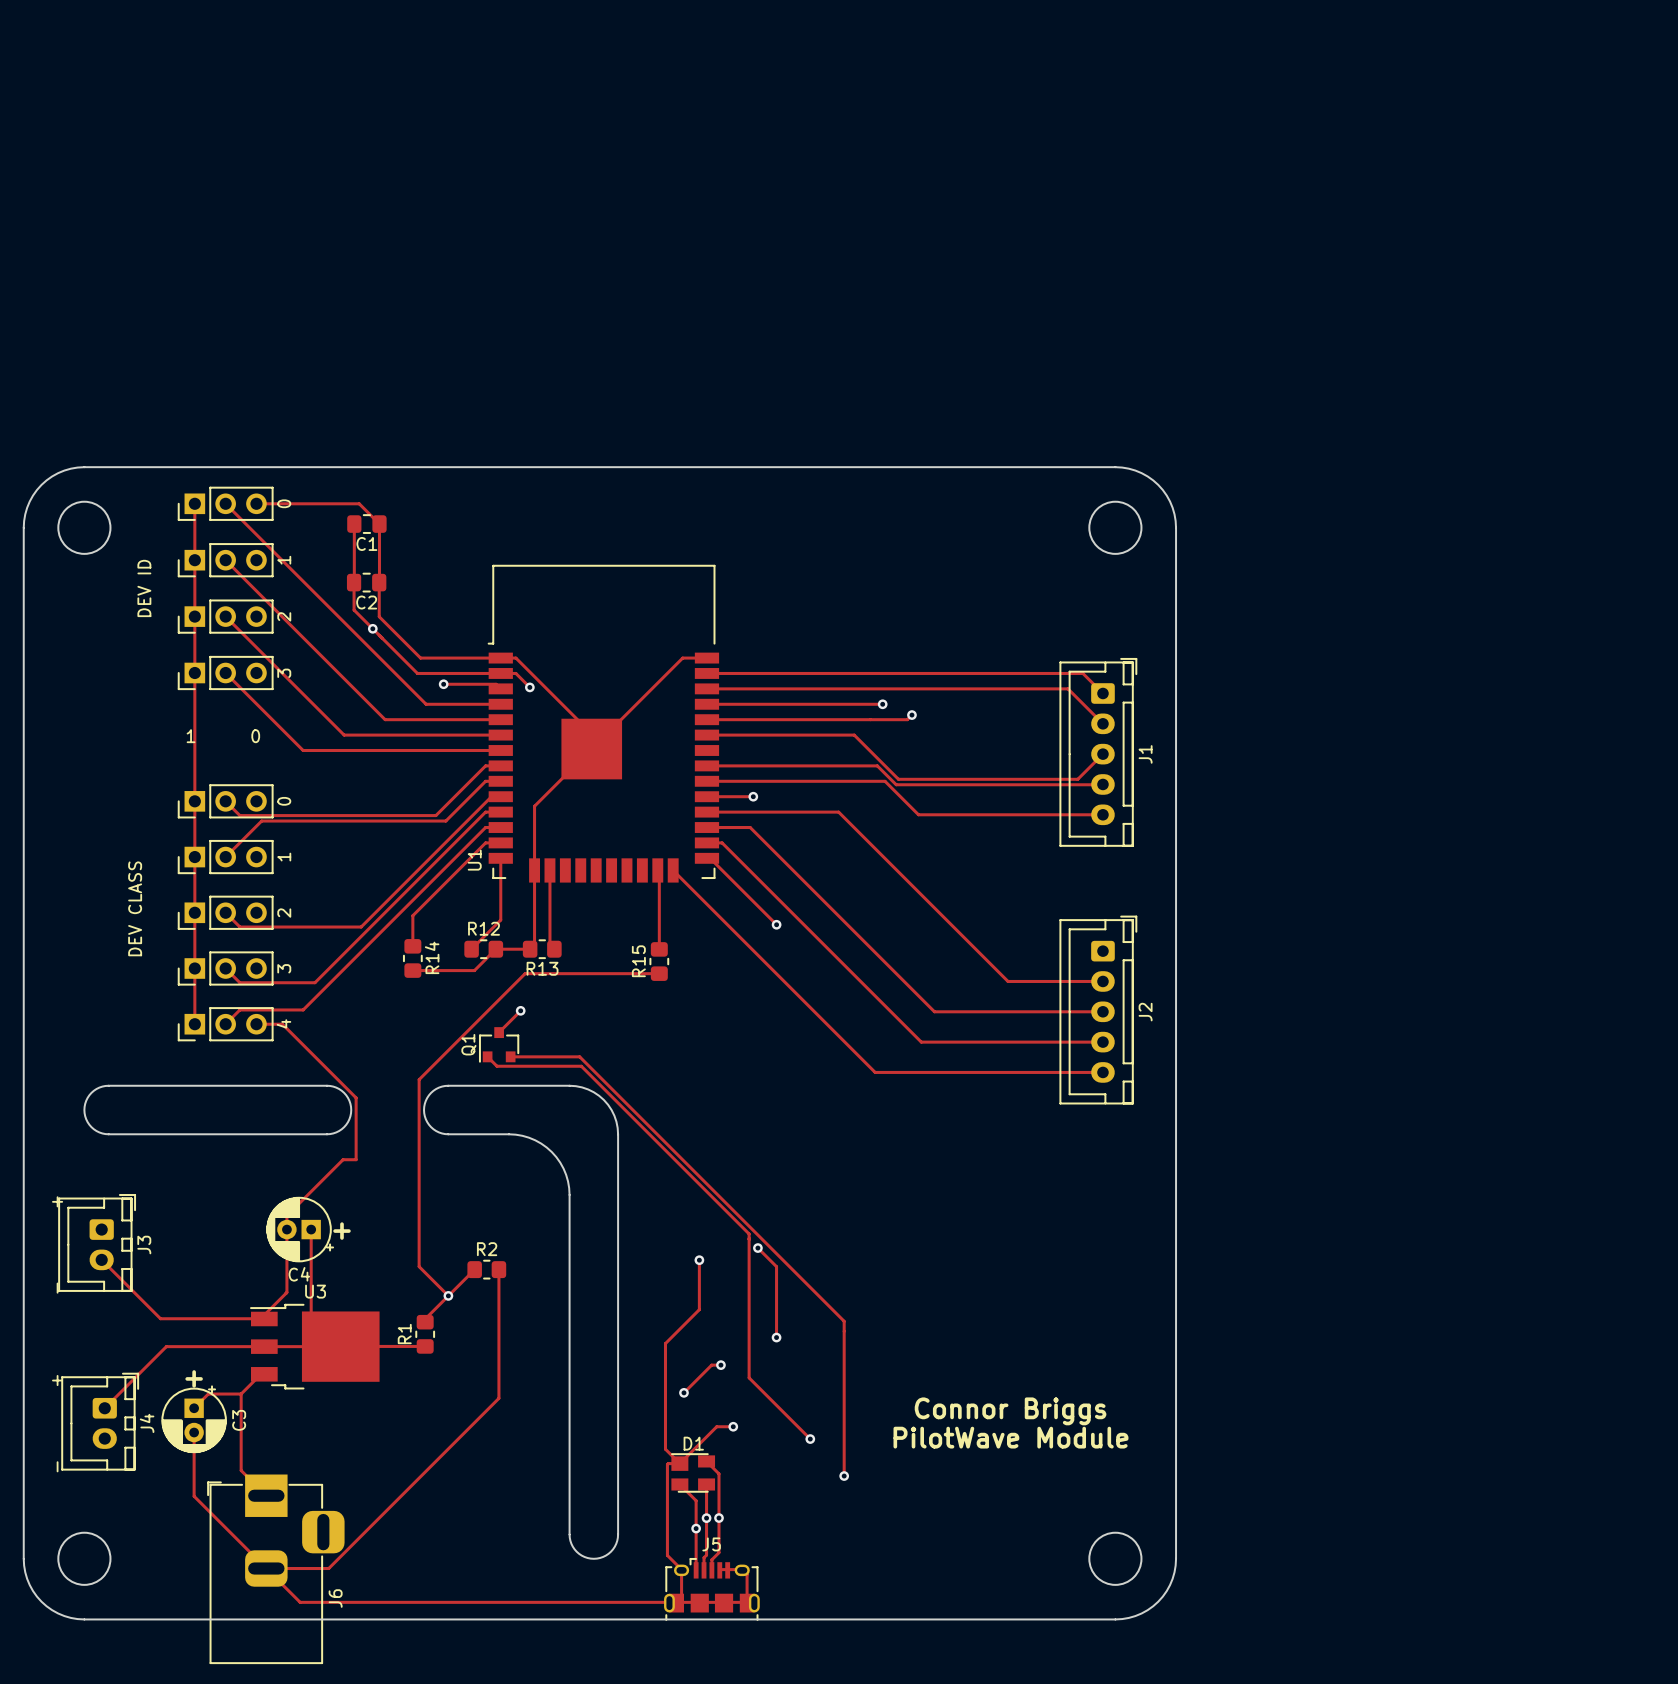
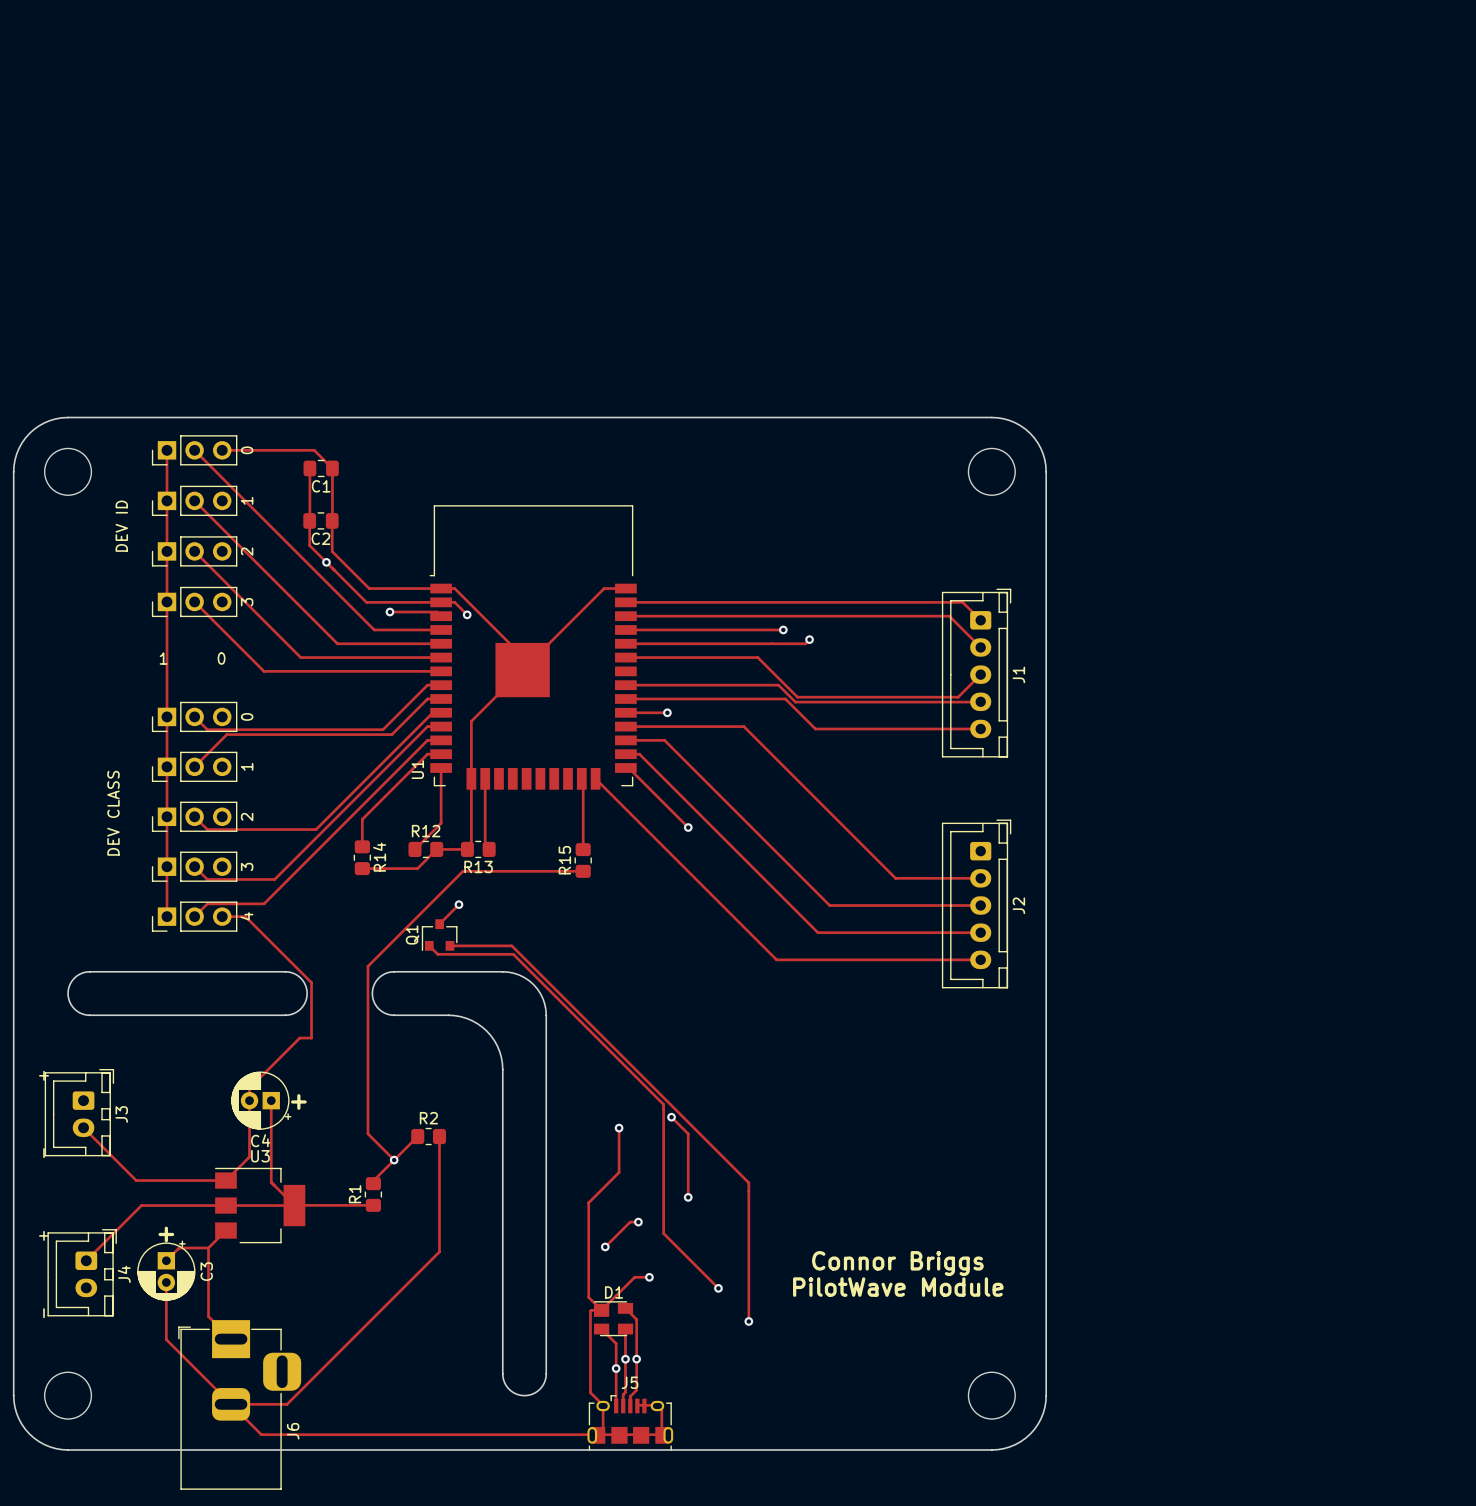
U3 footprint: [250, 1304, 380, 1390] -> [215, 1167, 306, 1244]

